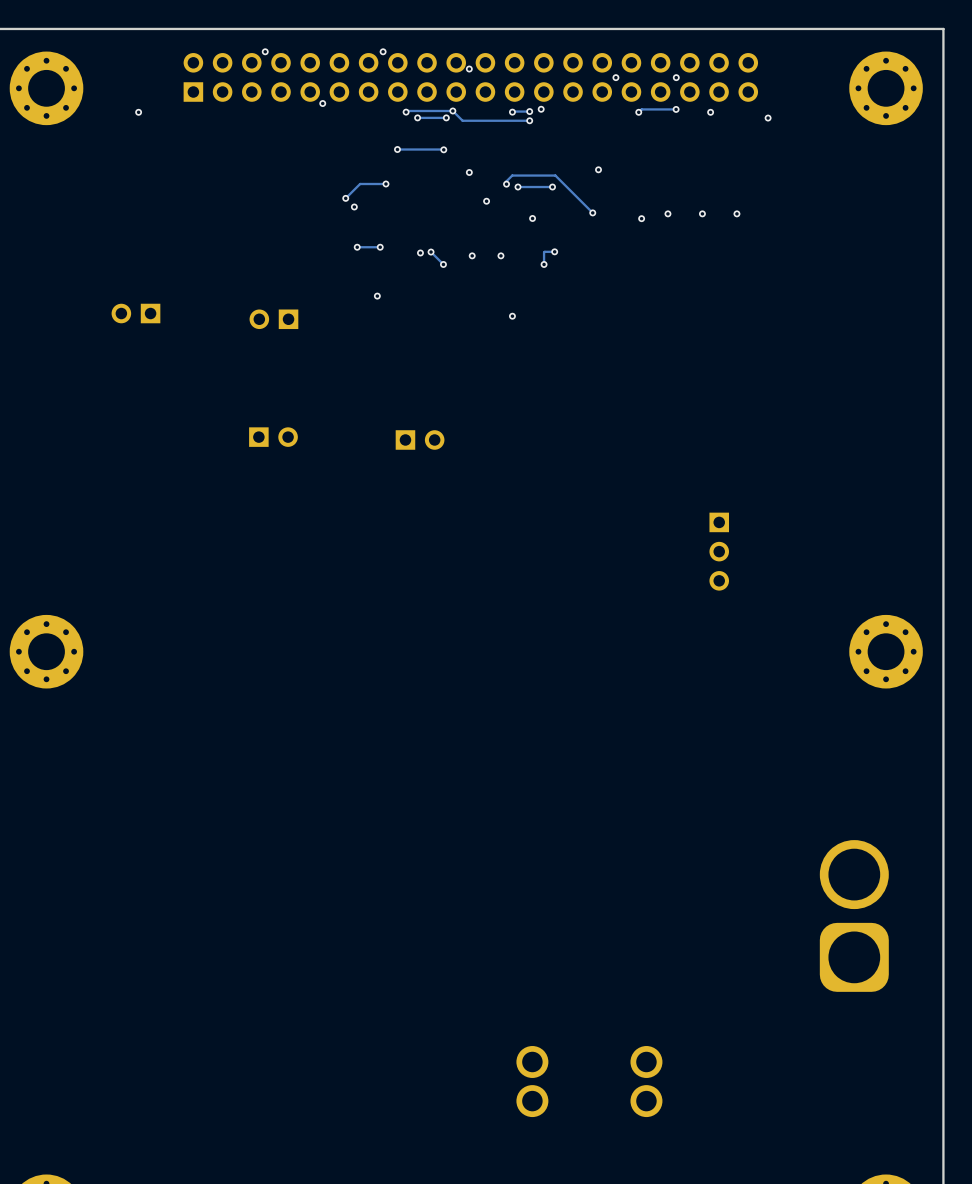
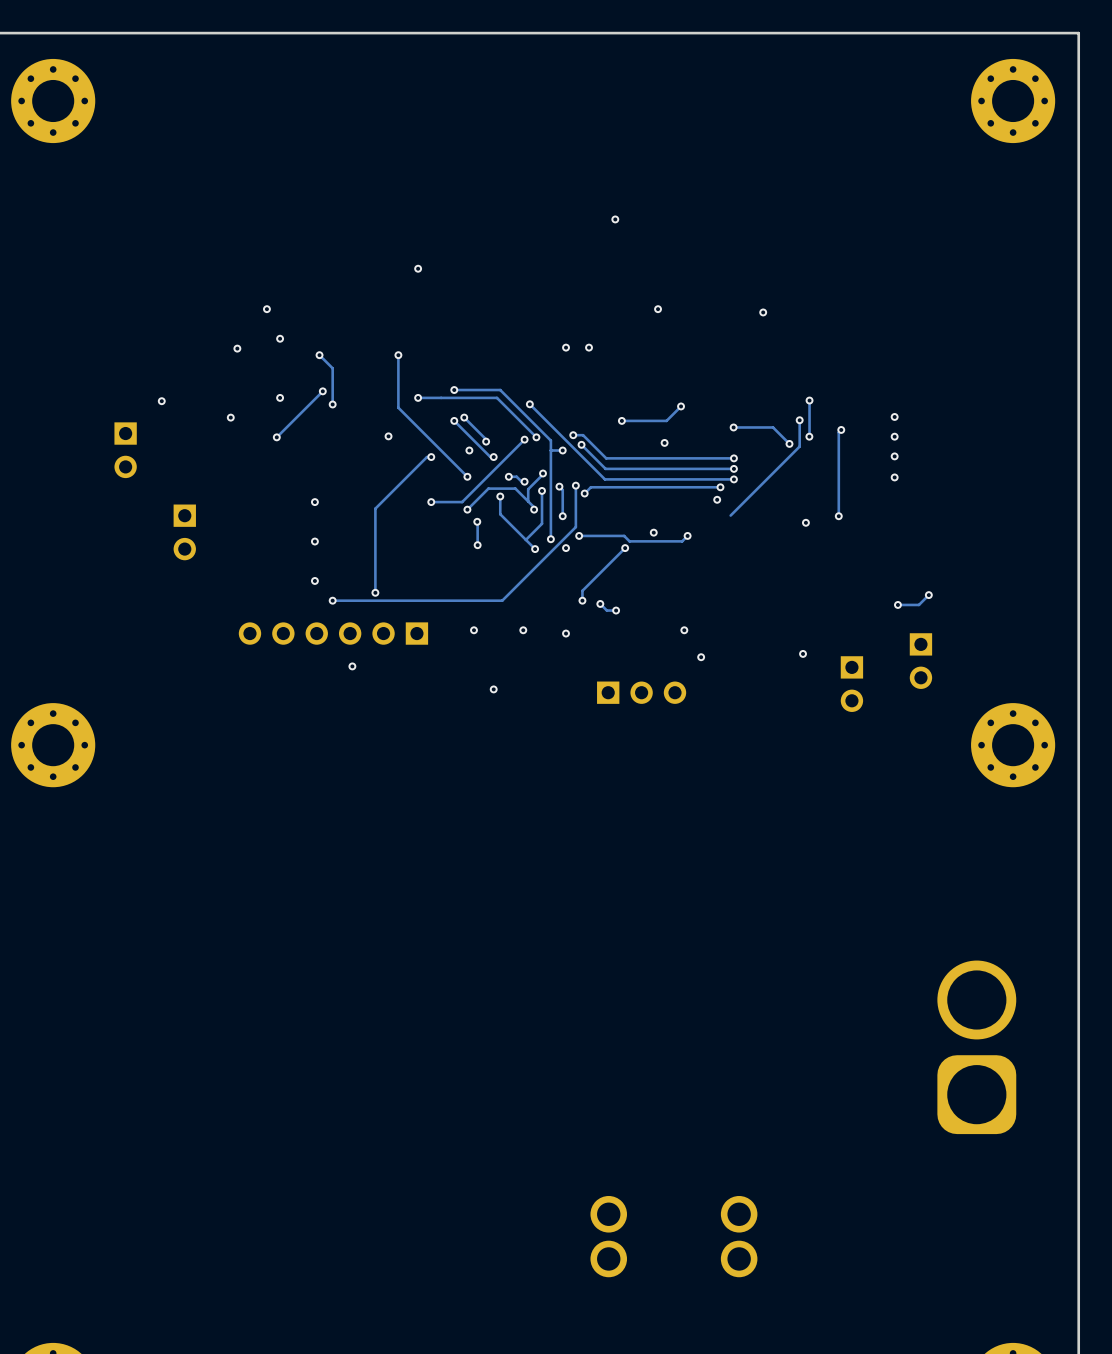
via: (265, 51) -> none
via: (383, 51) -> none
via: (469, 69) -> none
part: (470, 77) -> none
via: (615, 77) -> none
via: (676, 77) -> none
via: (322, 103) -> none
via: (541, 109) -> none
track: (676, 109) (641, 109) (638, 112) -> none
via: (676, 109) -> none
via: (452, 110) -> none
track: (529, 111) (512, 112) -> none
via: (529, 111) -> none
via: (138, 112) -> none
track: (406, 112) (452, 110) (462, 120) (529, 120) -> none
via: (406, 112) -> none
via: (512, 112) -> none
via: (638, 112) -> none
via: (710, 112) -> none
via: (417, 117) -> none
track: (446, 117) (417, 117) -> none
via: (446, 117) -> none
via: (768, 118) -> none
via: (529, 120) -> none
track: (397, 149) (443, 149) -> none
via: (397, 149) -> none
via: (443, 149) -> none
via: (598, 169) -> none
via: (469, 172) -> none
track: (385, 183) (360, 183) (345, 198) -> none
via: (385, 183) -> none
track: (506, 184) (506, 181) (512, 175) (555, 175) (592, 212) -> none
via: (506, 184) -> none
via: (518, 187) -> none
track: (552, 187) (518, 187) -> none
via: (552, 187) -> none
via: none -> (615, 219)
via: (345, 198) -> none
via: (486, 201) -> none
via: (354, 206) -> none
via: (592, 212) -> none
via: (667, 213) -> none
via: (702, 213) -> none
via: (736, 213) -> none
via: (532, 218) -> none
via: (641, 218) -> none
via: none -> (418, 268)
via: (357, 247) -> none
track: (380, 247) (357, 247) -> none
via: (380, 247) -> none
track: (554, 251) (544, 252) (544, 264) -> none
via: (554, 251) -> none
via: (420, 252) -> none
track: (431, 252) (443, 264) -> none
via: (431, 252) -> none
via: (472, 255) -> none
via: (500, 255) -> none
via: (443, 264) -> none
via: (544, 264) -> none
via: none -> (266, 309)
via: none -> (658, 309)
via: none -> (763, 312)
via: none -> (280, 338)
via: (377, 296) -> none
via: none -> (237, 348)
via: none -> (566, 347)
via: none -> (589, 347)
track: none -> (319, 355) (332, 368) (332, 404)
via: none -> (319, 355)
track: none -> (398, 355) (398, 407) (467, 476)
via: none -> (398, 355)
part: (135, 313) -> none
via: (512, 316) -> none
part: (273, 319) -> none
track: none -> (454, 390) (500, 390) (550, 440) (550, 539)
via: none -> (454, 390)
track: none -> (322, 391) (276, 437)
via: none -> (322, 391)
via: none -> (280, 397)
track: none -> (418, 397) (496, 397) (536, 437)
via: none -> (418, 397)
via: none -> (161, 401)
track: none -> (809, 400) (809, 436)
via: none -> (809, 400)
via: none -> (332, 404)
track: none -> (529, 404) (604, 479) (733, 479)
via: none -> (529, 404)
track: none -> (681, 406) (666, 420) (621, 420)
via: none -> (681, 406)
via: none -> (894, 416)
via: none -> (230, 417)
track: none -> (464, 417) (486, 441)
via: none -> (464, 417)
track: none -> (799, 420) (799, 446) (730, 515)
via: none -> (799, 420)
track: none -> (454, 420) (490, 457) (493, 457)
via: none -> (454, 420)
via: none -> (621, 420)
track: none -> (733, 427) (773, 427) (789, 443)
via: none -> (733, 427)
track: none -> (841, 429) (838, 432) (838, 516)
via: none -> (841, 429)
track: none -> (573, 435) (583, 435) (606, 458) (733, 458)
via: none -> (573, 435)
via: none -> (388, 436)
via: none -> (809, 436)
via: none -> (894, 436)
via: none -> (276, 437)
via: none -> (536, 437)
track: none -> (524, 439) (462, 502) (431, 502)
via: none -> (524, 439)
via: none -> (486, 441)
via: none -> (664, 442)
via: none -> (789, 443)
track: none -> (581, 444) (605, 468) (733, 468)
via: none -> (581, 444)
part: none -> (125, 450)
via: none -> (469, 450)
track: none -> (562, 450) (550, 450)
via: none -> (562, 450)
track: none -> (431, 457) (426, 457) (375, 508) (375, 592)
via: none -> (431, 457)
via: none -> (493, 457)
via: none -> (894, 456)
via: none -> (733, 458)
via: none -> (733, 468)
track: none -> (543, 473) (528, 489) (528, 501)
via: none -> (543, 473)
via: none -> (467, 476)
track: none -> (508, 476) (516, 476) (521, 481) (524, 481)
via: none -> (508, 476)
via: none -> (894, 477)
via: none -> (733, 479)
via: none -> (524, 481)
track: none -> (575, 485) (575, 527) (502, 600) (332, 600)
via: none -> (575, 485)
track: none -> (559, 486) (562, 489) (562, 516)
via: none -> (559, 486)
track: none -> (720, 487) (590, 487) (584, 493)
via: none -> (720, 487)
track: none -> (542, 490) (542, 523) (525, 539)
via: none -> (542, 490)
via: none -> (584, 493)
track: none -> (500, 496) (500, 514) (535, 549)
via: none -> (500, 496)
part: (273, 437) -> none
via: none -> (717, 499)
via: none -> (314, 502)
via: none -> (431, 502)
part: (420, 439) -> none
via: none -> (467, 509)
via: none -> (534, 509)
track: none -> (536, 509) (534, 509) (534, 507) (515, 488) (488, 488) (467, 509)
via: none -> (562, 516)
via: none -> (838, 516)
track: none -> (477, 521) (477, 545)
via: none -> (477, 521)
via: none -> (805, 522)
part: none -> (184, 532)
via: none -> (653, 532)
via: none -> (579, 535)
track: none -> (687, 535) (682, 541) (629, 541) (624, 535) (579, 535)
via: none -> (687, 535)
via: none -> (550, 539)
via: none -> (314, 541)
via: none -> (477, 545)
via: none -> (566, 548)
track: none -> (625, 548) (582, 590) (582, 600)
via: none -> (625, 548)
via: none -> (535, 549)
via: none -> (314, 580)
via: none -> (375, 592)
track: none -> (928, 595) (918, 604) (897, 604)
via: none -> (928, 595)
via: none -> (332, 600)
via: none -> (582, 600)
track: none -> (600, 603) (606, 610) (616, 610)
via: none -> (600, 603)
via: none -> (897, 604)
via: none -> (616, 610)
via: none -> (473, 630)
via: none -> (523, 630)
via: none -> (684, 630)
part rotation: 0° (719, 551) -> 90° counterclockwise (641, 692)
part position: (719, 551) -> (641, 692)
part: none -> (333, 633)
via: none -> (566, 633)
via: none -> (803, 653)
via: none -> (701, 657)
part: none -> (920, 661)
via: none -> (352, 666)
part: none -> (851, 684)
via: none -> (493, 689)

